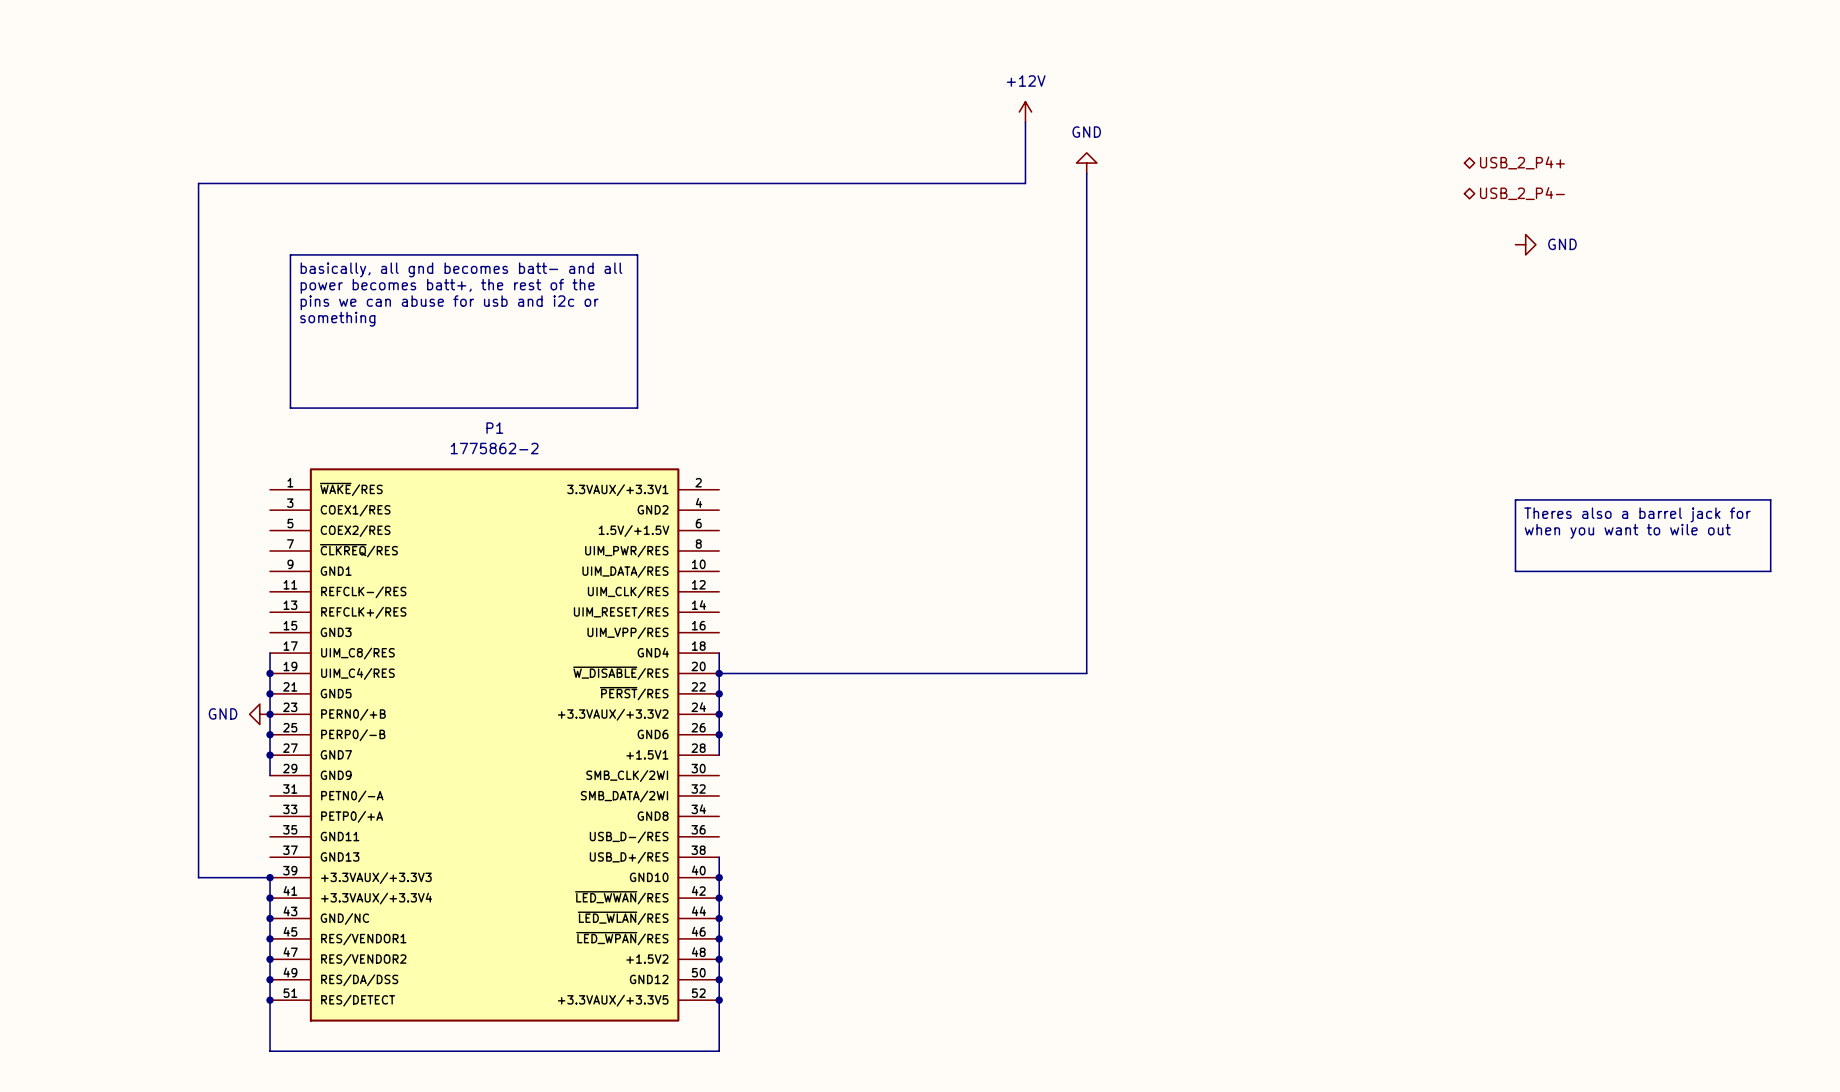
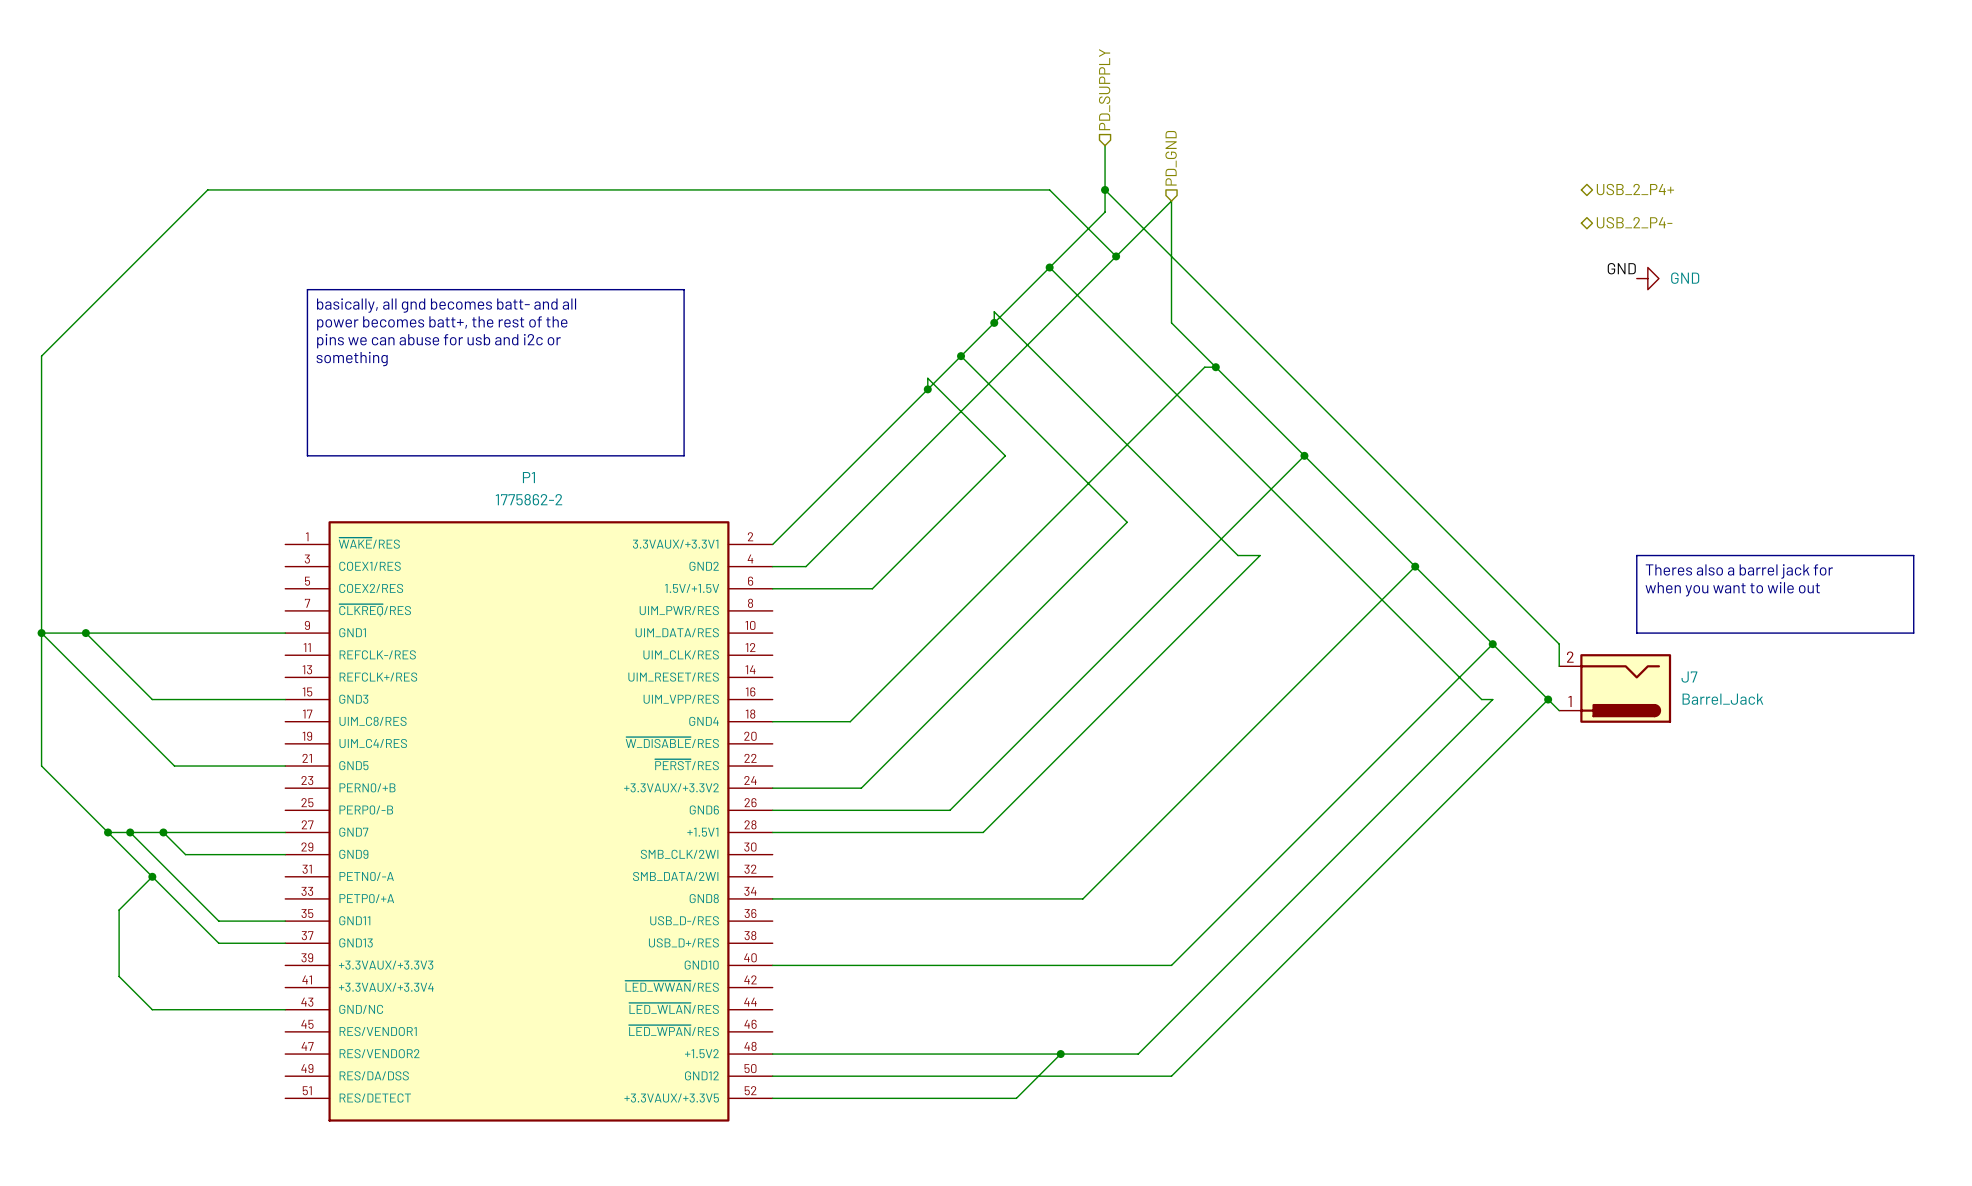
hierarchical label: none -> PD_SUPPLY (1104, 89)
power symbol: +12V (1025, 112) -> none
hierarchical label: none -> PD_GND (1171, 158)
wire: none -> (1105, 189) (1559, 644) (1559, 666)
junction: none -> (1105, 189)
power symbol: GND (1086, 163) -> none
wire: none -> (1171, 201) (805, 566) (772, 566)
wire: (1025, 183) (198, 183) (198, 877) (270, 877) (270, 1051) (719, 1051) (719, 857) -> (1105, 212) (772, 544)
wire: none -> (1116, 256) (1049, 189) (207, 189) (41, 356) (41, 766) (218, 943) (285, 943)
junction: none -> (1116, 256)
wire: none -> (1049, 267) (1481, 699) (1492, 699) (1138, 1054) (772, 1054)
junction: none -> (1049, 267)
label: none -> GND (1621, 268)
junction: none -> (994, 322)
wire: (1086, 285) (1086, 673) (719, 673) -> (1171, 322) (1559, 710)
wire: none -> (961, 356) (1127, 522) (861, 788) (772, 788)
junction: none -> (961, 356)
wire: none -> (1215, 367) (1204, 367) (850, 721) (772, 721)
junction: none -> (1215, 367)
wire: none -> (927, 389) (927, 378) (1005, 455) (872, 588) (772, 588)
junction: none -> (927, 389)
wire: none -> (1304, 455) (949, 810) (772, 810)
junction: none -> (1304, 455)
wire: none -> (1415, 566) (1082, 898) (772, 898)
junction: none -> (1415, 566)
junction: none -> (41, 633)
wire: none -> (85, 633) (152, 699) (285, 699)
junction: none -> (85, 633)
wire: none -> (285, 633) (41, 633) (174, 766) (285, 766)
wire: none -> (1492, 644) (1171, 965) (772, 965)
junction: none -> (1492, 644)
J7: none -> Barrel_Jack (1615, 688)
wire: none -> (1548, 699) (1171, 1076) (772, 1076)
junction: none -> (1548, 699)
wire: (270, 653) (270, 775) -> (163, 832) (185, 854) (285, 854)
wire: (719, 653) (719, 755) -> (994, 322) (994, 311) (1237, 555) (1260, 555) (983, 832) (772, 832)
junction: (270, 673) -> none
junction: (719, 673) -> none
junction: (270, 693) -> none
junction: (719, 693) -> none
power symbol: GND (259, 714) -> none
junction: (270, 714) -> none
junction: (719, 714) -> none
junction: (270, 734) -> none
junction: (719, 734) -> none
wire: none -> (108, 832) (285, 832)
junction: none -> (108, 832)
wire: none -> (130, 832) (218, 921) (285, 921)
junction: none -> (130, 832)
junction: none -> (163, 832)
junction: (270, 755) -> none
wire: none -> (152, 876) (119, 910) (119, 976) (152, 1009) (285, 1009)
junction: none -> (152, 876)
junction: (270, 877) -> none
junction: (719, 877) -> none
junction: (270, 898) -> none
junction: (719, 898) -> none
junction: (270, 918) -> none
junction: (719, 918) -> none
junction: (270, 938) -> none
junction: (719, 938) -> none
junction: (270, 959) -> none
junction: (719, 959) -> none
wire: none -> (1060, 1054) (1016, 1098) (772, 1098)
junction: none -> (1060, 1054)
junction: (270, 979) -> none
junction: (719, 979) -> none
junction: (270, 1000) -> none
junction: (719, 1000) -> none

